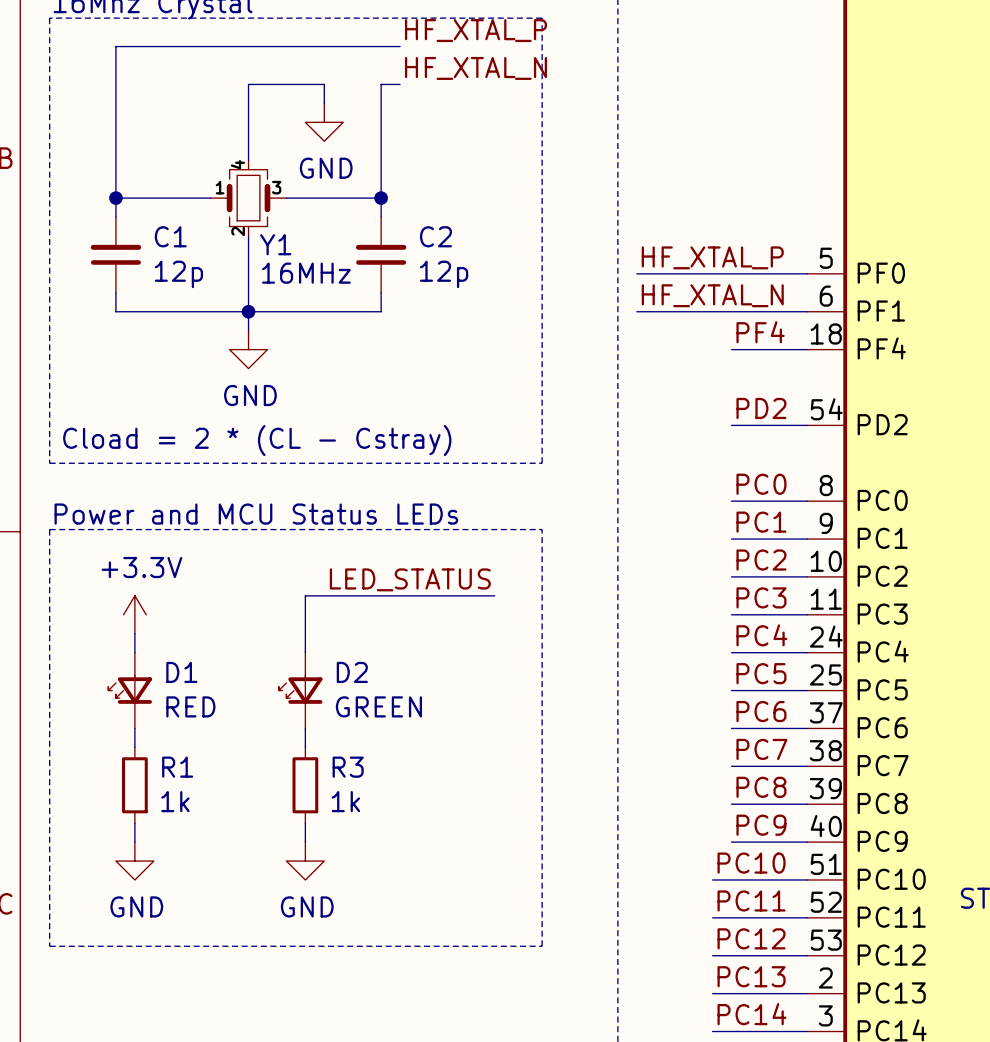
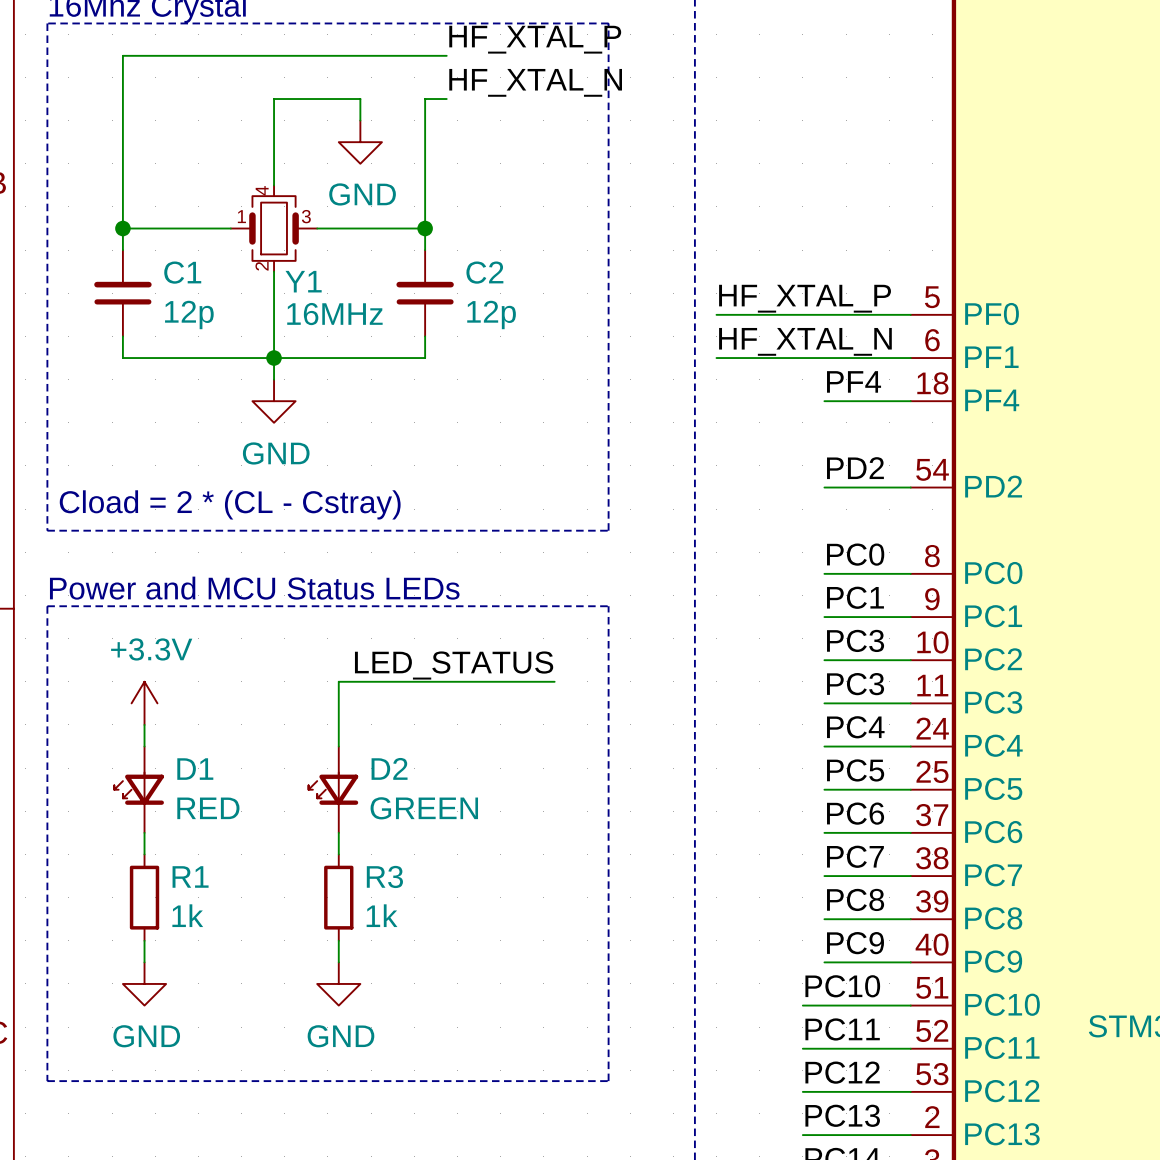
label: PC2 (761, 560) -> PC3 (855, 640)

